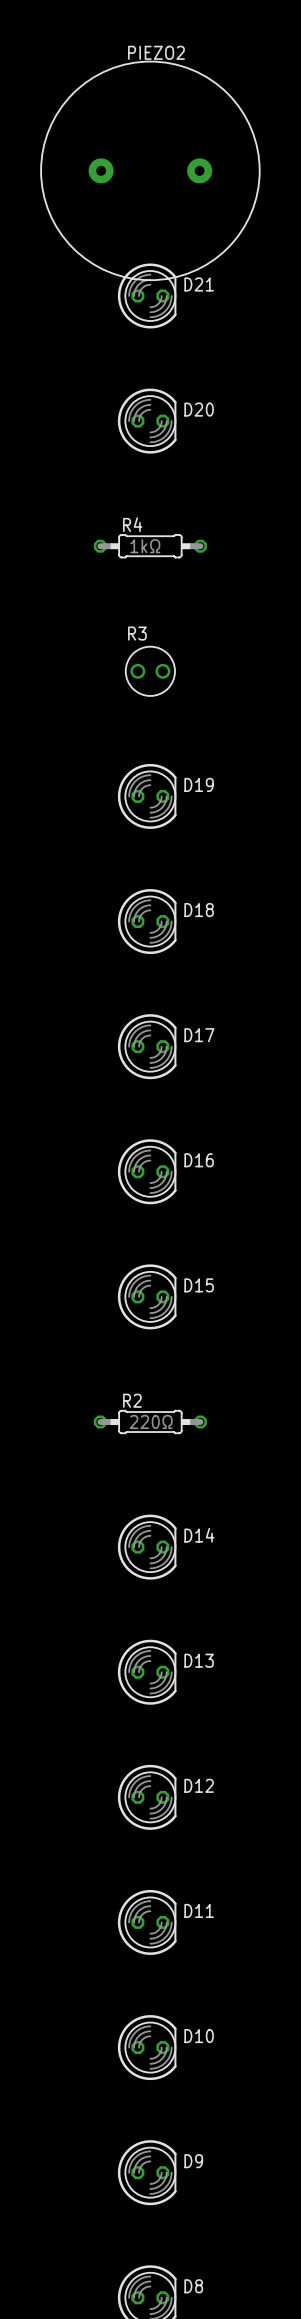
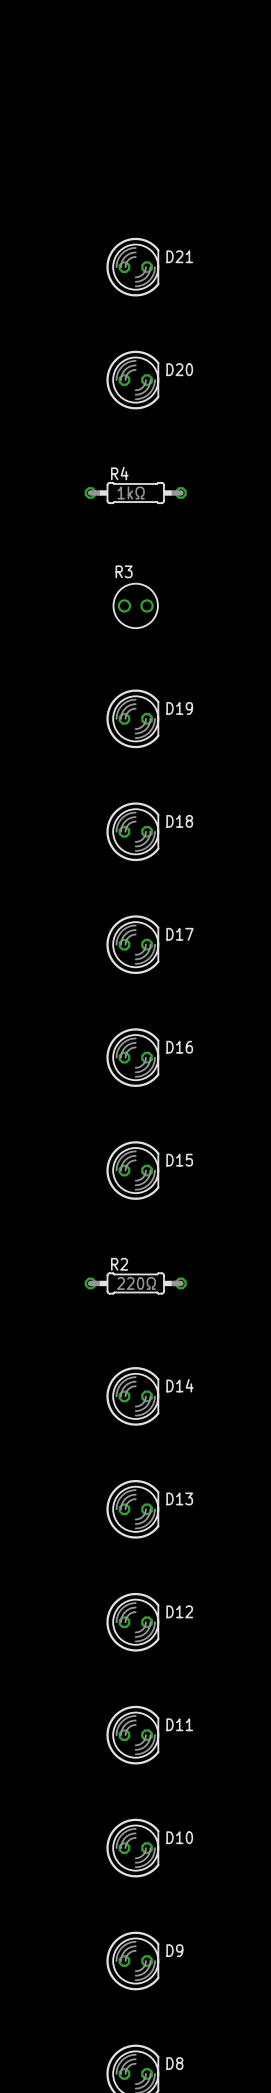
PIEZO2: (150, 170) -> none

